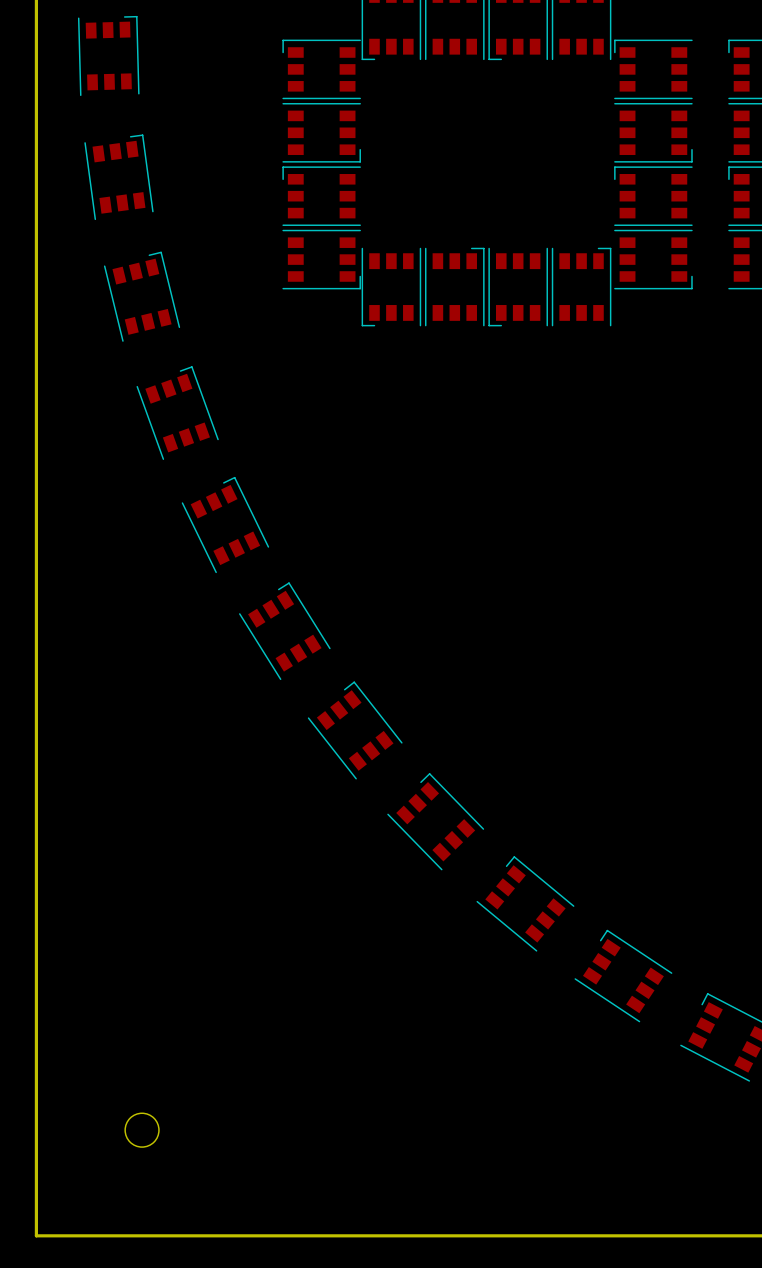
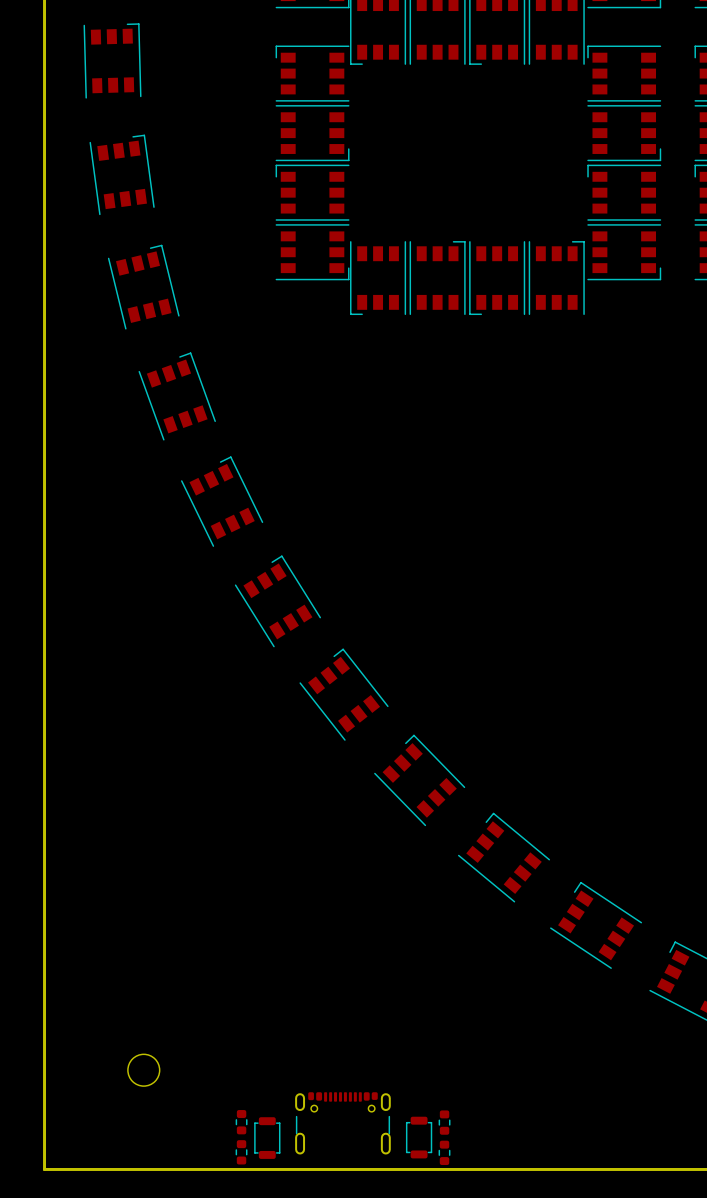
part: none -> (241, 1122)
part: none -> (444, 1122)
part: none -> (342, 1123)
part: none -> (419, 1137)
part: none -> (267, 1138)
part: none -> (241, 1152)
part: none -> (444, 1152)

